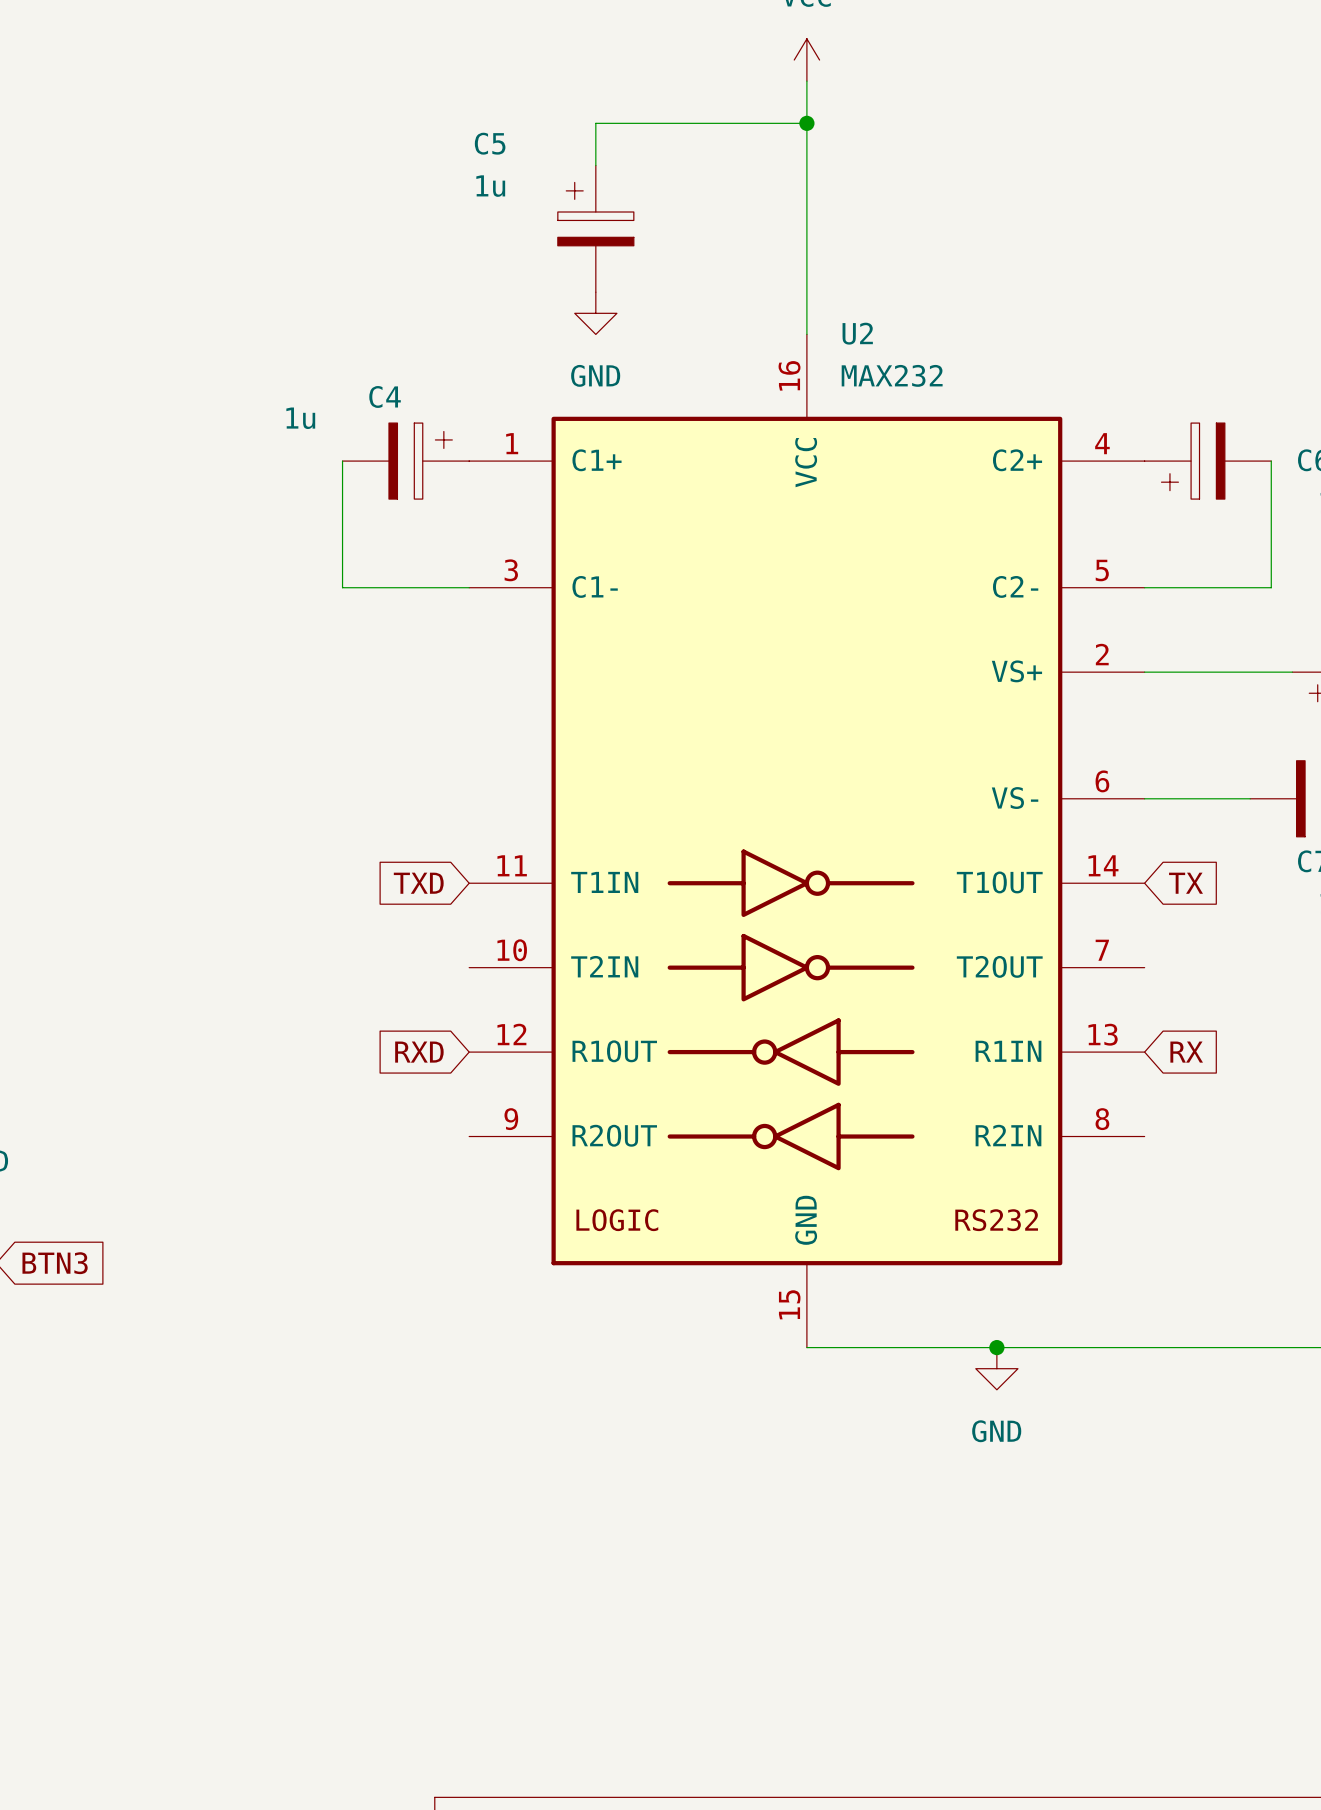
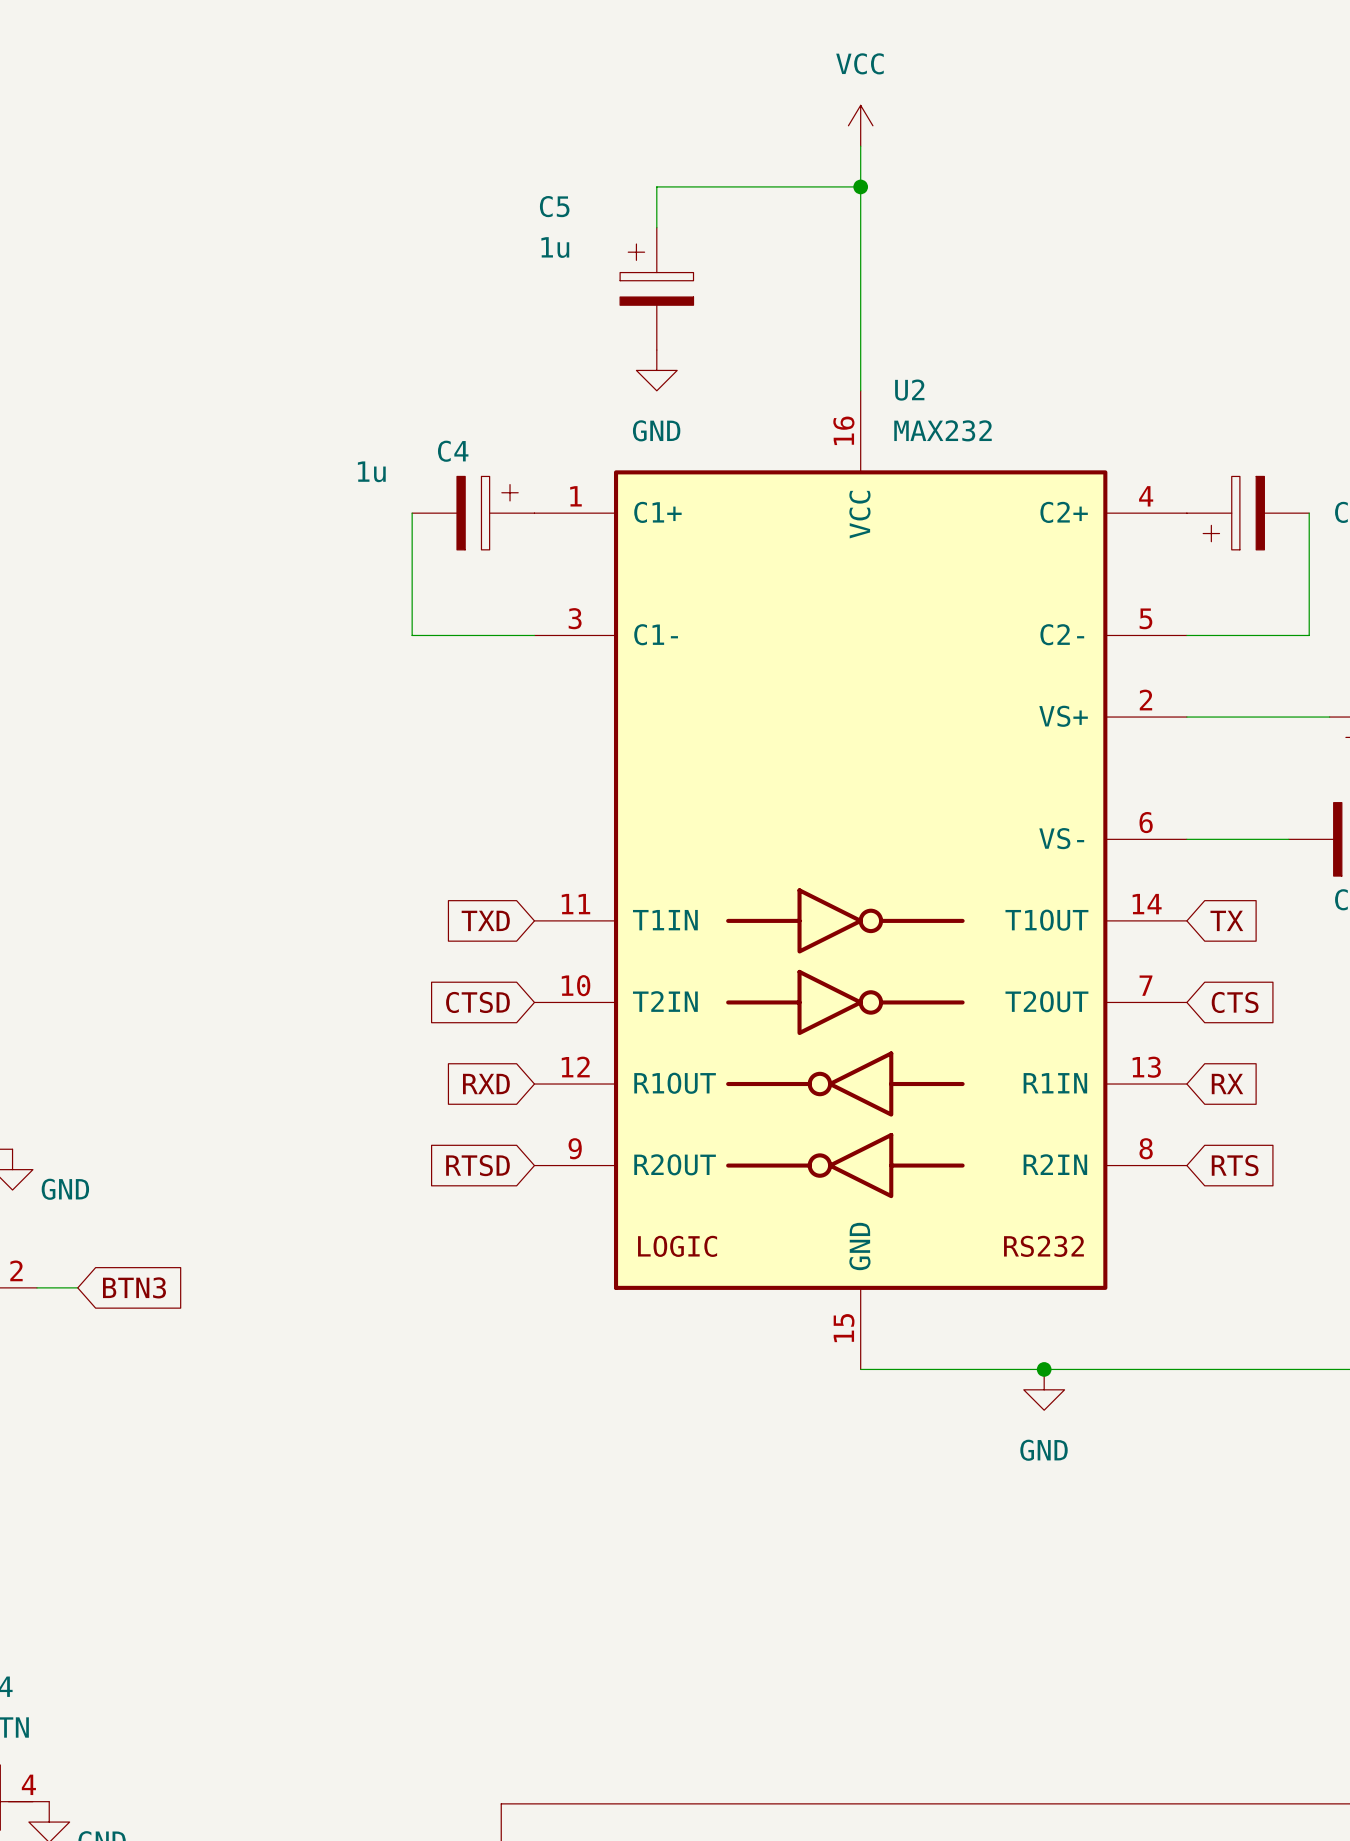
global label: none -> CTSD (477, 1002)
global label: none -> CTS (1235, 1002)
global label: none -> RTSD (477, 1165)
global label: none -> RTS (1235, 1165)

